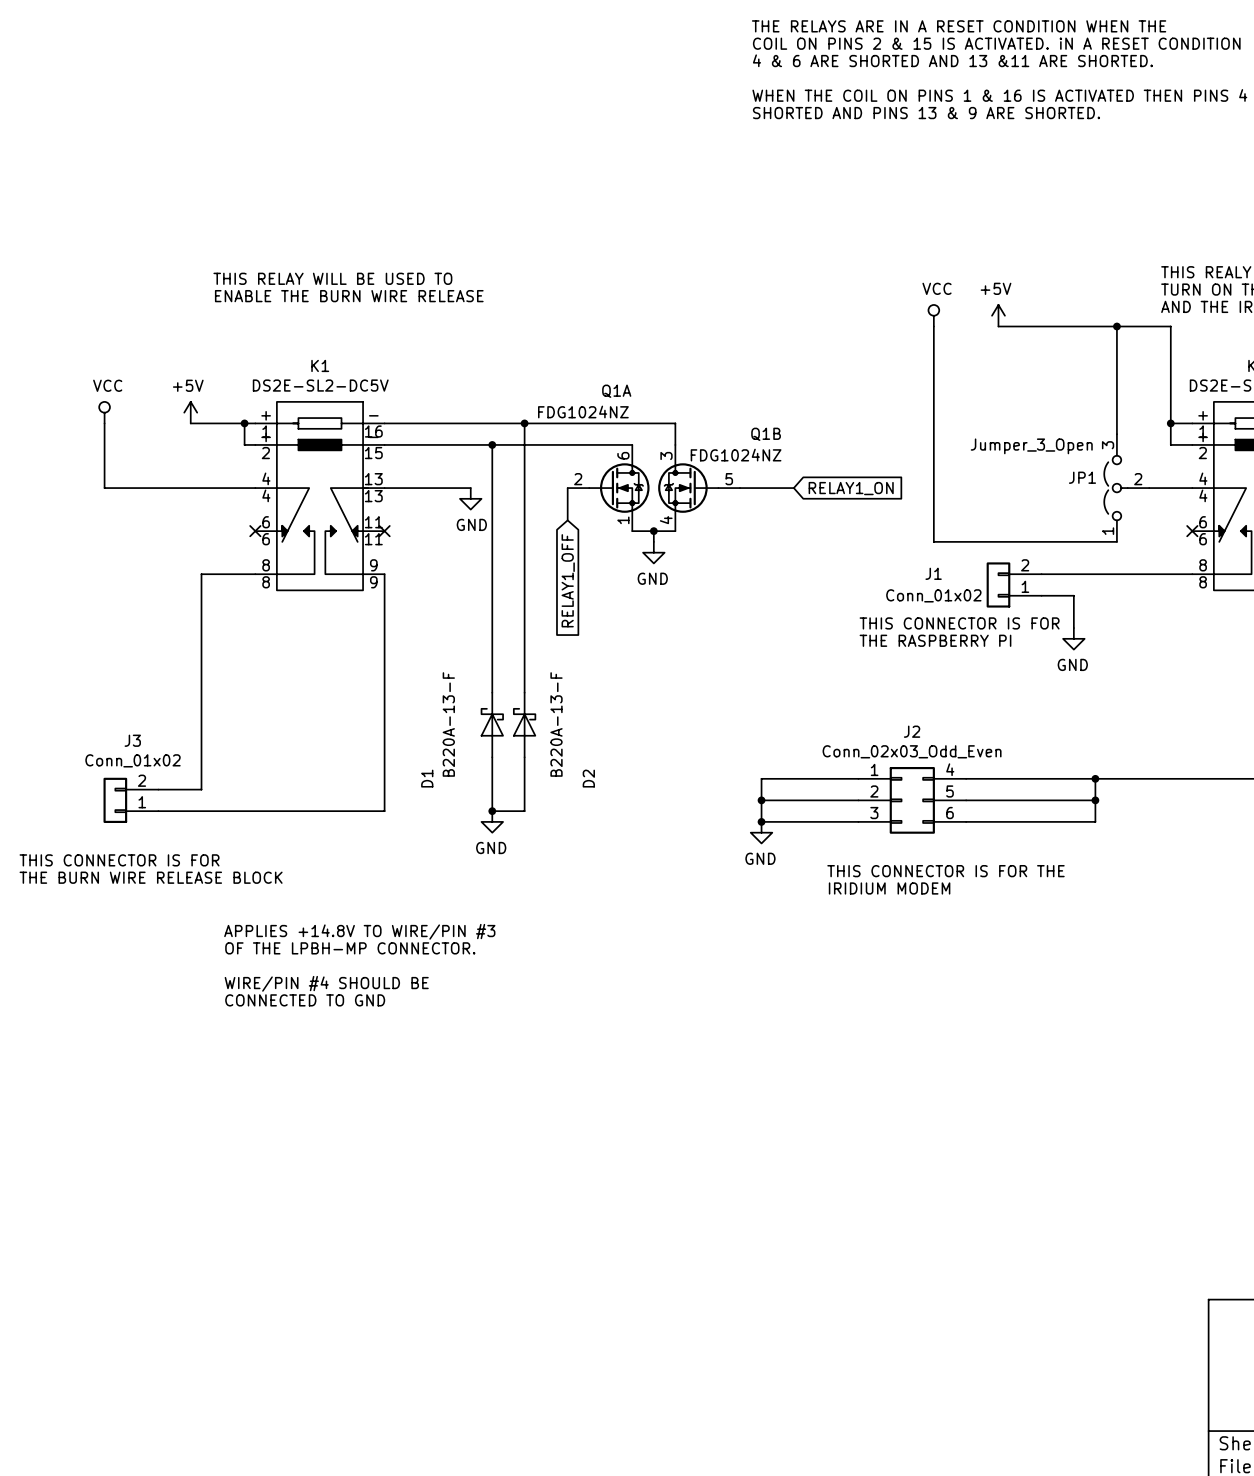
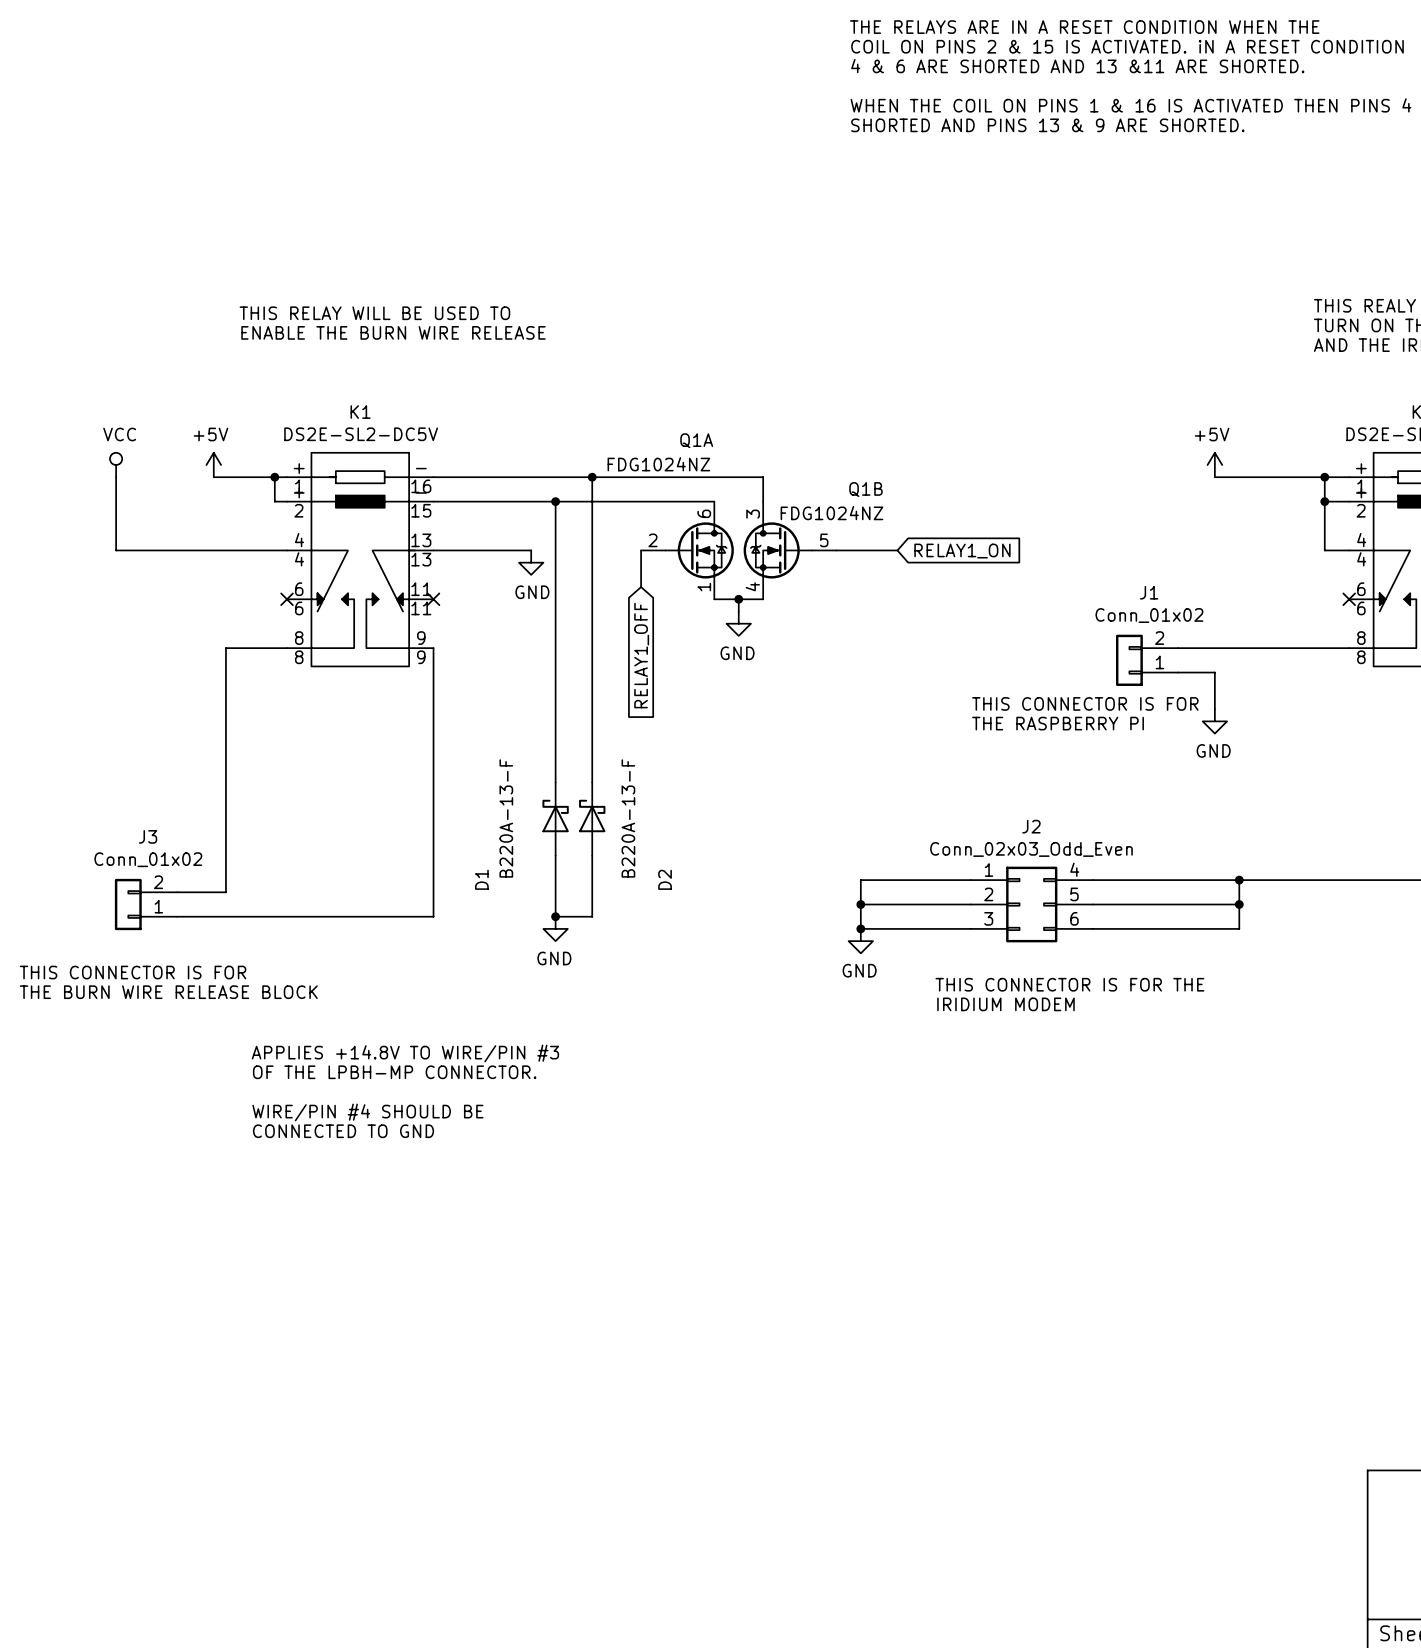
power symbol: VCC (933, 315) -> none
power symbol position: +5V (998, 315) -> +5V (1214, 464)
wire: (933, 326) (933, 541) (1116, 541) -> none
wire: (998, 326) (1170, 326) (1170, 423) -> (1214, 477) (1324, 477)
wire: (1116, 326) (1116, 434) -> none
junction: (1116, 326) -> none
junction: none -> (1324, 501)
JP1: Jumper_3_Open (1126, 488) -> none
wire: (1149, 488) (1170, 488) -> (1324, 501) (1324, 550)
J1 name position: J1 (933, 573) -> J1 (1149, 592)
J1 value position: Conn_01x02 (933, 595) -> Conn_01x02 (1149, 615)

